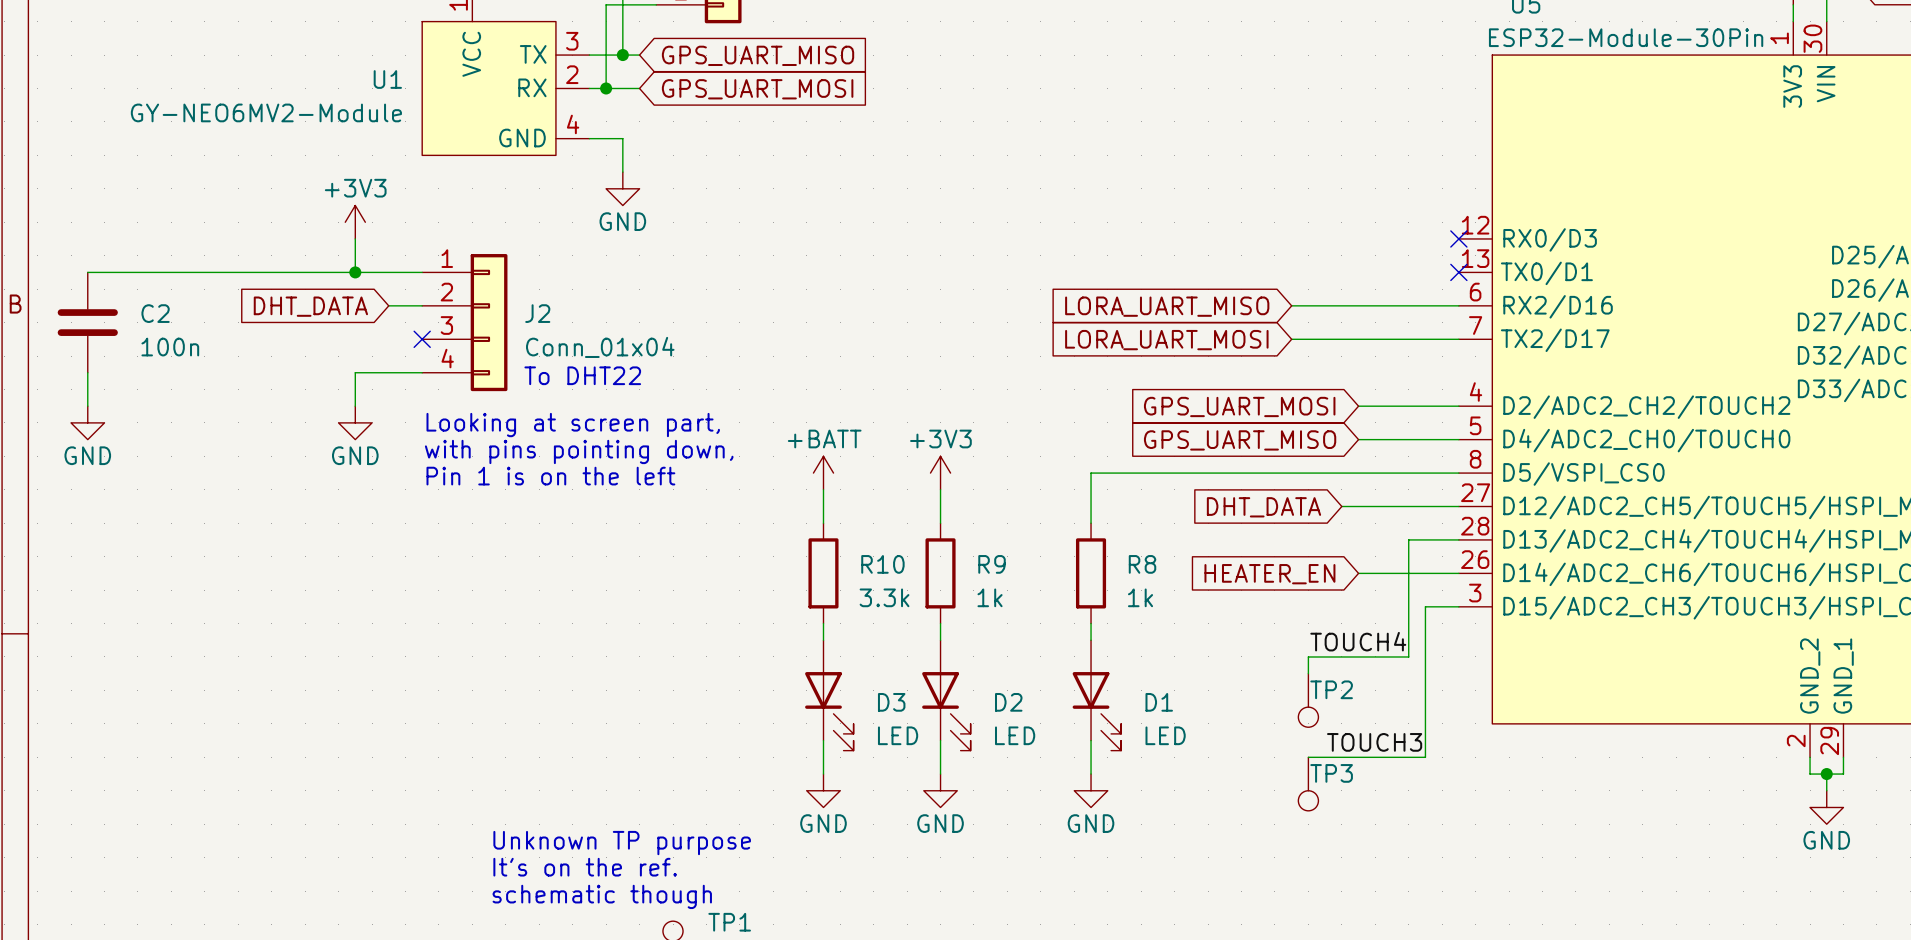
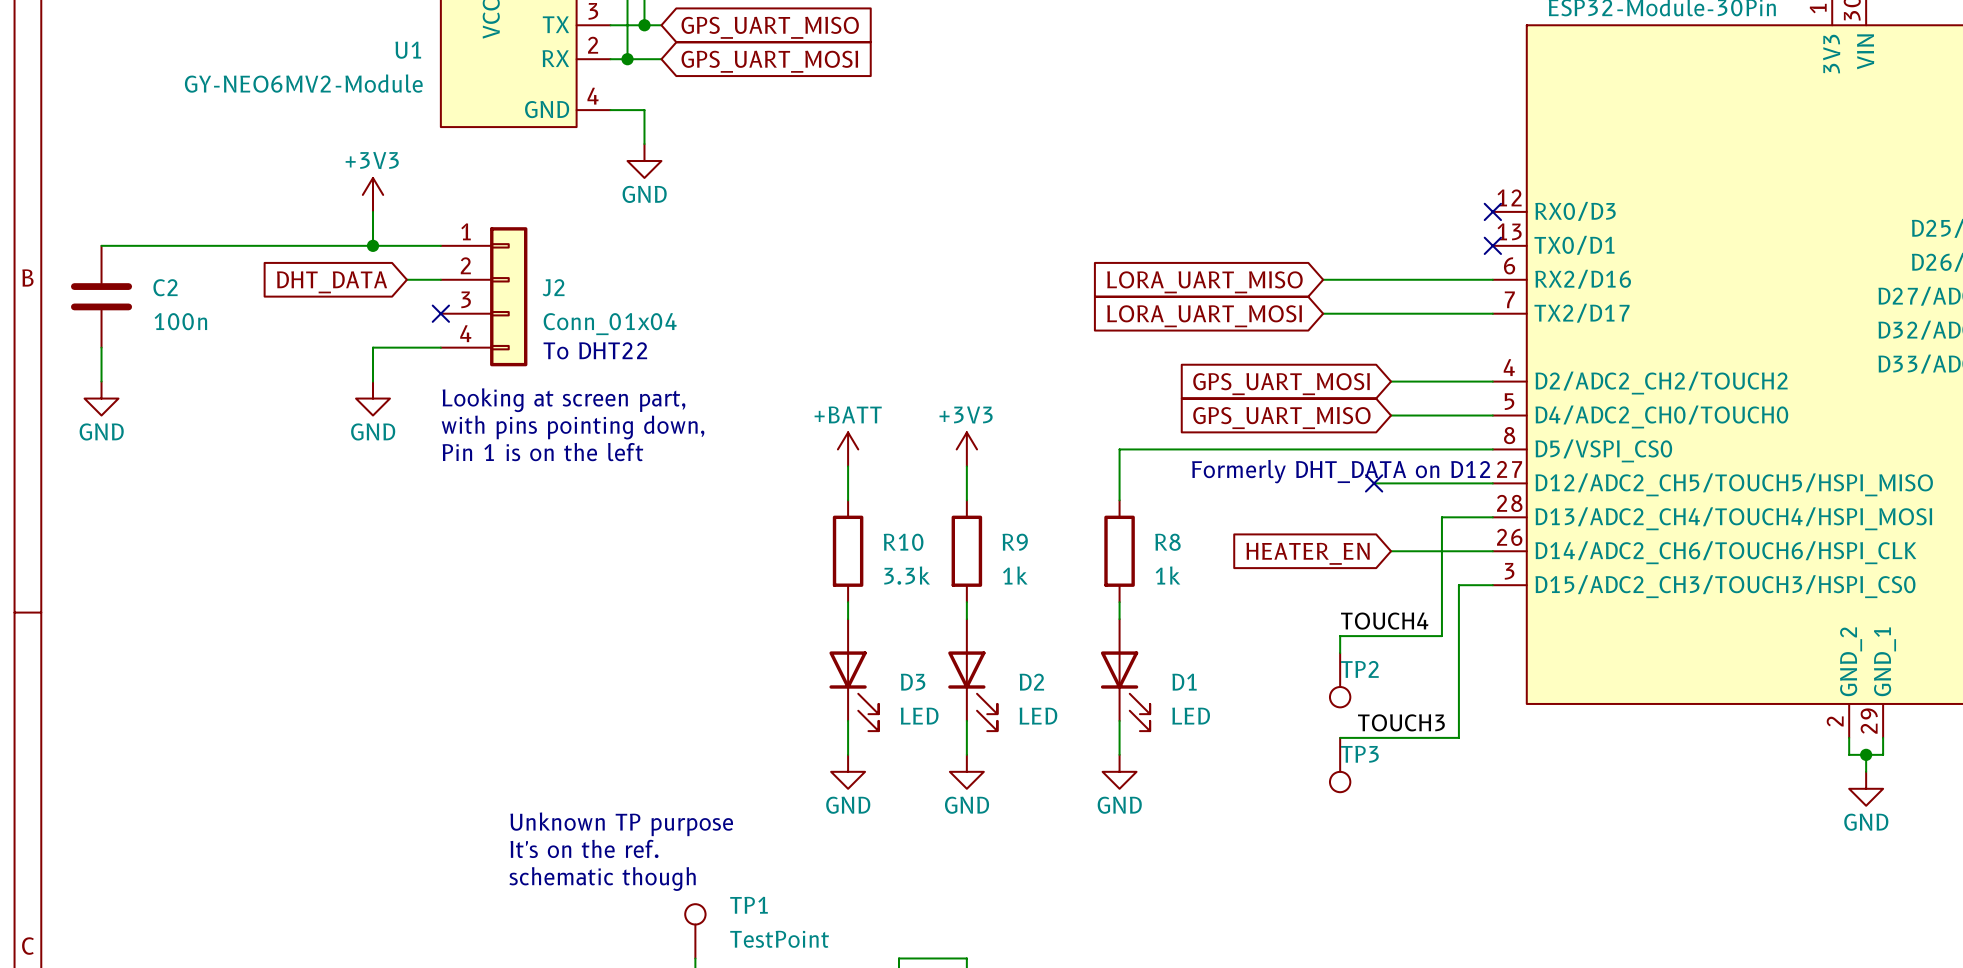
text: none -> Formerly DHT_DATA on D12 (1341, 471)
no-connect mark: none -> (1374, 483)
global label: DHT_DATA (1263, 507) -> none

